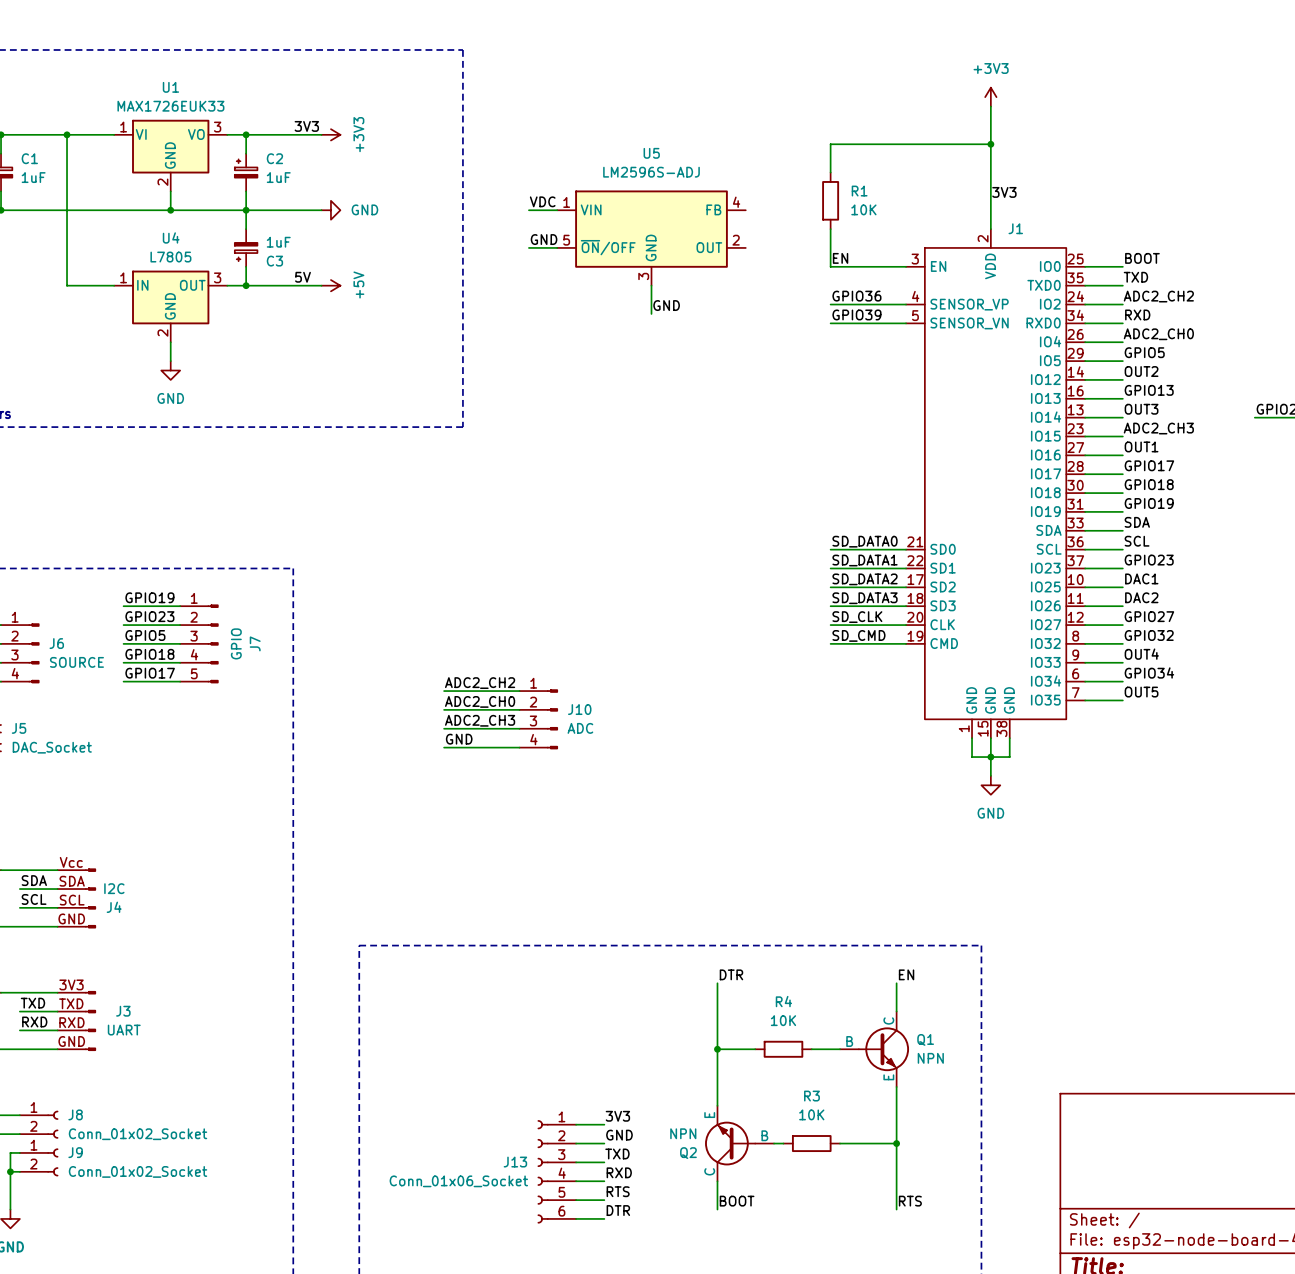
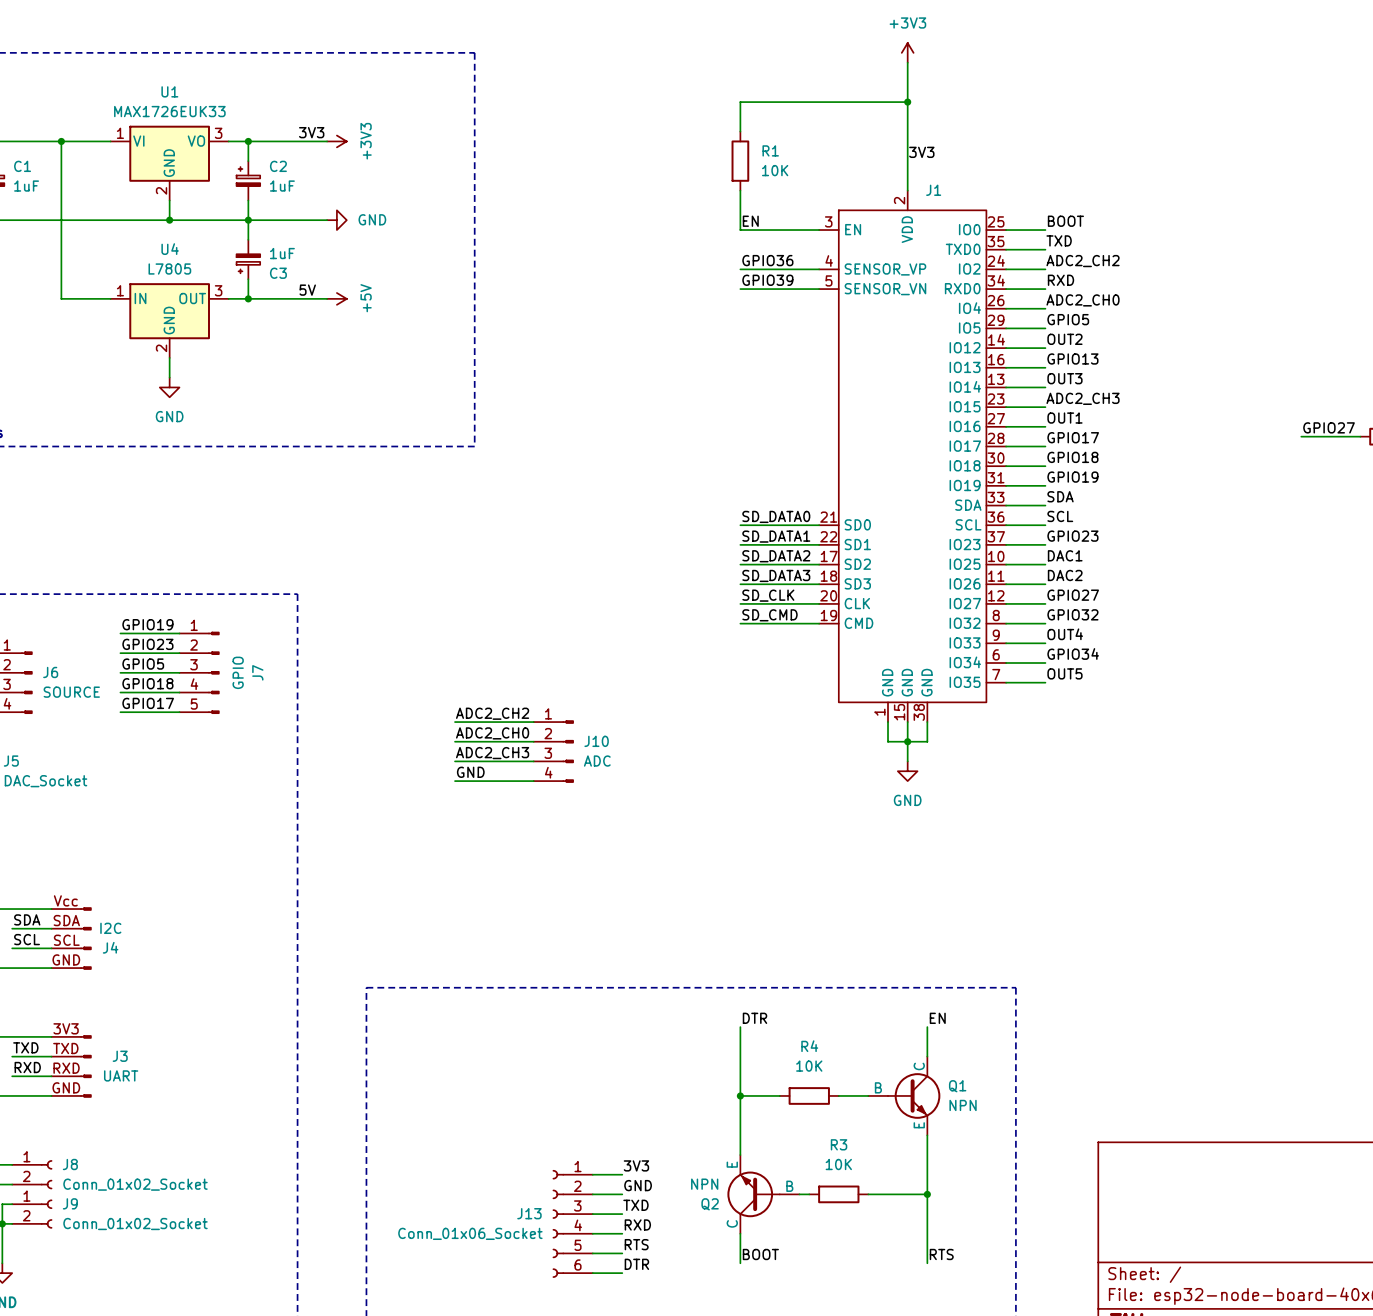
junction: none -> (907, 102)
power symbol position: +3V3 (990, 97) -> +3V3 (907, 52)
wire: (990, 106) (990, 229) -> (907, 62) (907, 190)
wire: (990, 144) (830, 144) (830, 172) -> (907, 102) (740, 102) (740, 131)
junction: (990, 144) -> none
label position: 3V3 (1004, 192) -> 3V3 (921, 152)
R1 position: (830, 200) -> (740, 161)
label: VDC (542, 201) -> none
wire: (528, 210) (557, 210) -> none
wire: (830, 229) (830, 266) (906, 266) -> (740, 190) (740, 230) (819, 230)
U5: LM2596S-ADJ (651, 238) -> none
label: GND (544, 239) -> none
wire: (528, 247) (557, 247) -> none
label position: EN (840, 258) -> EN (750, 221)
label position: BOOT (1142, 258) -> BOOT (1065, 221)
wire: (1085, 266) (1122, 266) -> (1006, 230) (1045, 230)
label position: TXD (1135, 277) -> TXD (1059, 240)
wire: (651, 285) (651, 313) -> none
wire: (1085, 285) (1122, 285) -> (1006, 249) (1045, 249)
label position: GPIO36 (856, 296) -> GPIO36 (767, 260)
label position: ADC2_CH2 (1158, 296) -> ADC2_CH2 (1083, 261)
wire: (830, 304) (906, 304) -> (740, 269) (819, 269)
wire: (1085, 304) (1122, 304) -> (1006, 269) (1045, 269)
label: GND (666, 305) -> none
label position: GPIO39 (856, 314) -> GPIO39 (767, 280)
label position: RXD (1137, 314) -> RXD (1060, 280)
wire: (830, 323) (906, 323) -> (740, 289) (819, 289)
wire: (1085, 323) (1122, 323) -> (1006, 289) (1045, 289)
label position: ADC2_CH0 (1158, 334) -> ADC2_CH0 (1083, 300)
wire: (1085, 342) (1122, 342) -> (1006, 308) (1045, 308)
label position: GPIO5 (1144, 352) -> GPIO5 (1068, 319)
wire: (1085, 361) (1122, 361) -> (1006, 328) (1045, 328)
label position: OUT2 (1141, 371) -> OUT2 (1064, 339)
wire: (1085, 379) (1122, 379) -> (1006, 348) (1045, 348)
label position: GPIO13 (1149, 390) -> GPIO13 (1072, 358)
wire: (1085, 398) (1122, 398) -> (1006, 367) (1045, 367)
label position: OUT3 (1141, 409) -> OUT3 (1064, 378)
wire: (1085, 417) (1122, 417) -> (1006, 387) (1045, 387)
label position: ADC2_CH3 (1158, 428) -> ADC2_CH3 (1083, 398)
wire: (1085, 436) (1122, 436) -> (1006, 407) (1045, 407)
label position: OUT1 (1141, 446) -> OUT1 (1064, 418)
wire: (1085, 455) (1122, 455) -> (1006, 426) (1045, 426)
label position: GPIO17 (1149, 465) -> GPIO17 (1073, 437)
wire: (1085, 474) (1122, 474) -> (1006, 446) (1045, 446)
J1 position: (995, 483) -> (912, 456)
label position: GPIO18 (1149, 484) -> GPIO18 (1072, 457)
wire: (1085, 493) (1122, 493) -> (1006, 466) (1045, 466)
label position: GPIO19 (1149, 503) -> GPIO19 (1072, 477)
wire: (1085, 511) (1122, 511) -> (1006, 485) (1045, 485)
label position: SDA (1137, 522) -> SDA (1060, 496)
wire: (1085, 530) (1122, 530) -> (1006, 505) (1045, 505)
label position: SD_DATA0 (865, 541) -> SD_DATA0 (776, 516)
label position: SCL (1137, 541) -> SCL (1060, 516)
wire: (830, 549) (906, 549) -> (740, 525) (819, 525)
wire: (1085, 549) (1122, 549) -> (1006, 525) (1045, 525)
label position: SD_DATA1 (865, 560) -> SD_DATA1 (776, 536)
label position: GPIO23 (1149, 560) -> GPIO23 (1072, 536)
wire: (830, 568) (906, 568) -> (740, 544) (819, 544)
wire: (1085, 568) (1122, 568) -> (1006, 544) (1045, 544)
label position: DAC1 (1141, 578) -> DAC1 (1065, 555)
label position: SD_DATA2 (865, 579) -> SD_DATA2 (776, 556)
wire: (830, 587) (906, 587) -> (740, 564) (819, 564)
wire: (1085, 587) (1122, 587) -> (1006, 564) (1045, 564)
label position: DAC2 (1141, 597) -> DAC2 (1065, 575)
label position: SD_DATA3 (865, 598) -> SD_DATA3 (776, 575)
wire: (830, 606) (906, 606) -> (740, 584) (819, 584)
wire: (1085, 606) (1122, 606) -> (1006, 584) (1045, 584)
label position: GPIO27 (1149, 616) -> GPIO27 (1073, 595)
label position: SD_CLK (857, 617) -> SD_CLK (768, 595)
wire: (830, 625) (906, 625) -> (740, 603) (819, 603)
wire: (1085, 625) (1122, 625) -> (1006, 603) (1045, 603)
label position: SD_CMD (858, 635) -> SD_CMD (769, 615)
label position: GPIO32 (1149, 635) -> GPIO32 (1072, 614)
wire: (830, 643) (906, 643) -> (740, 623) (819, 623)
wire: (1085, 643) (1122, 643) -> (1006, 623) (1045, 623)
label position: OUT4 (1141, 654) -> OUT4 (1065, 634)
wire: (1085, 662) (1122, 662) -> (1006, 643) (1045, 643)
label position: GPIO34 (1149, 672) -> GPIO34 (1073, 653)
wire: (1085, 681) (1122, 681) -> (1006, 662) (1045, 662)
label position: OUT5 (1141, 692) -> OUT5 (1064, 673)
wire: (1085, 700) (1122, 700) -> (1006, 682) (1045, 682)
junction: none -> (907, 741)
wire: (972, 738) (972, 757) (1009, 757) (1009, 738) -> (888, 722) (888, 741) (927, 741) (927, 722)
wire: (990, 738) (990, 775) -> (907, 722) (907, 761)
junction: (990, 757) -> none
power symbol position: GND (990, 785) -> GND (907, 771)

